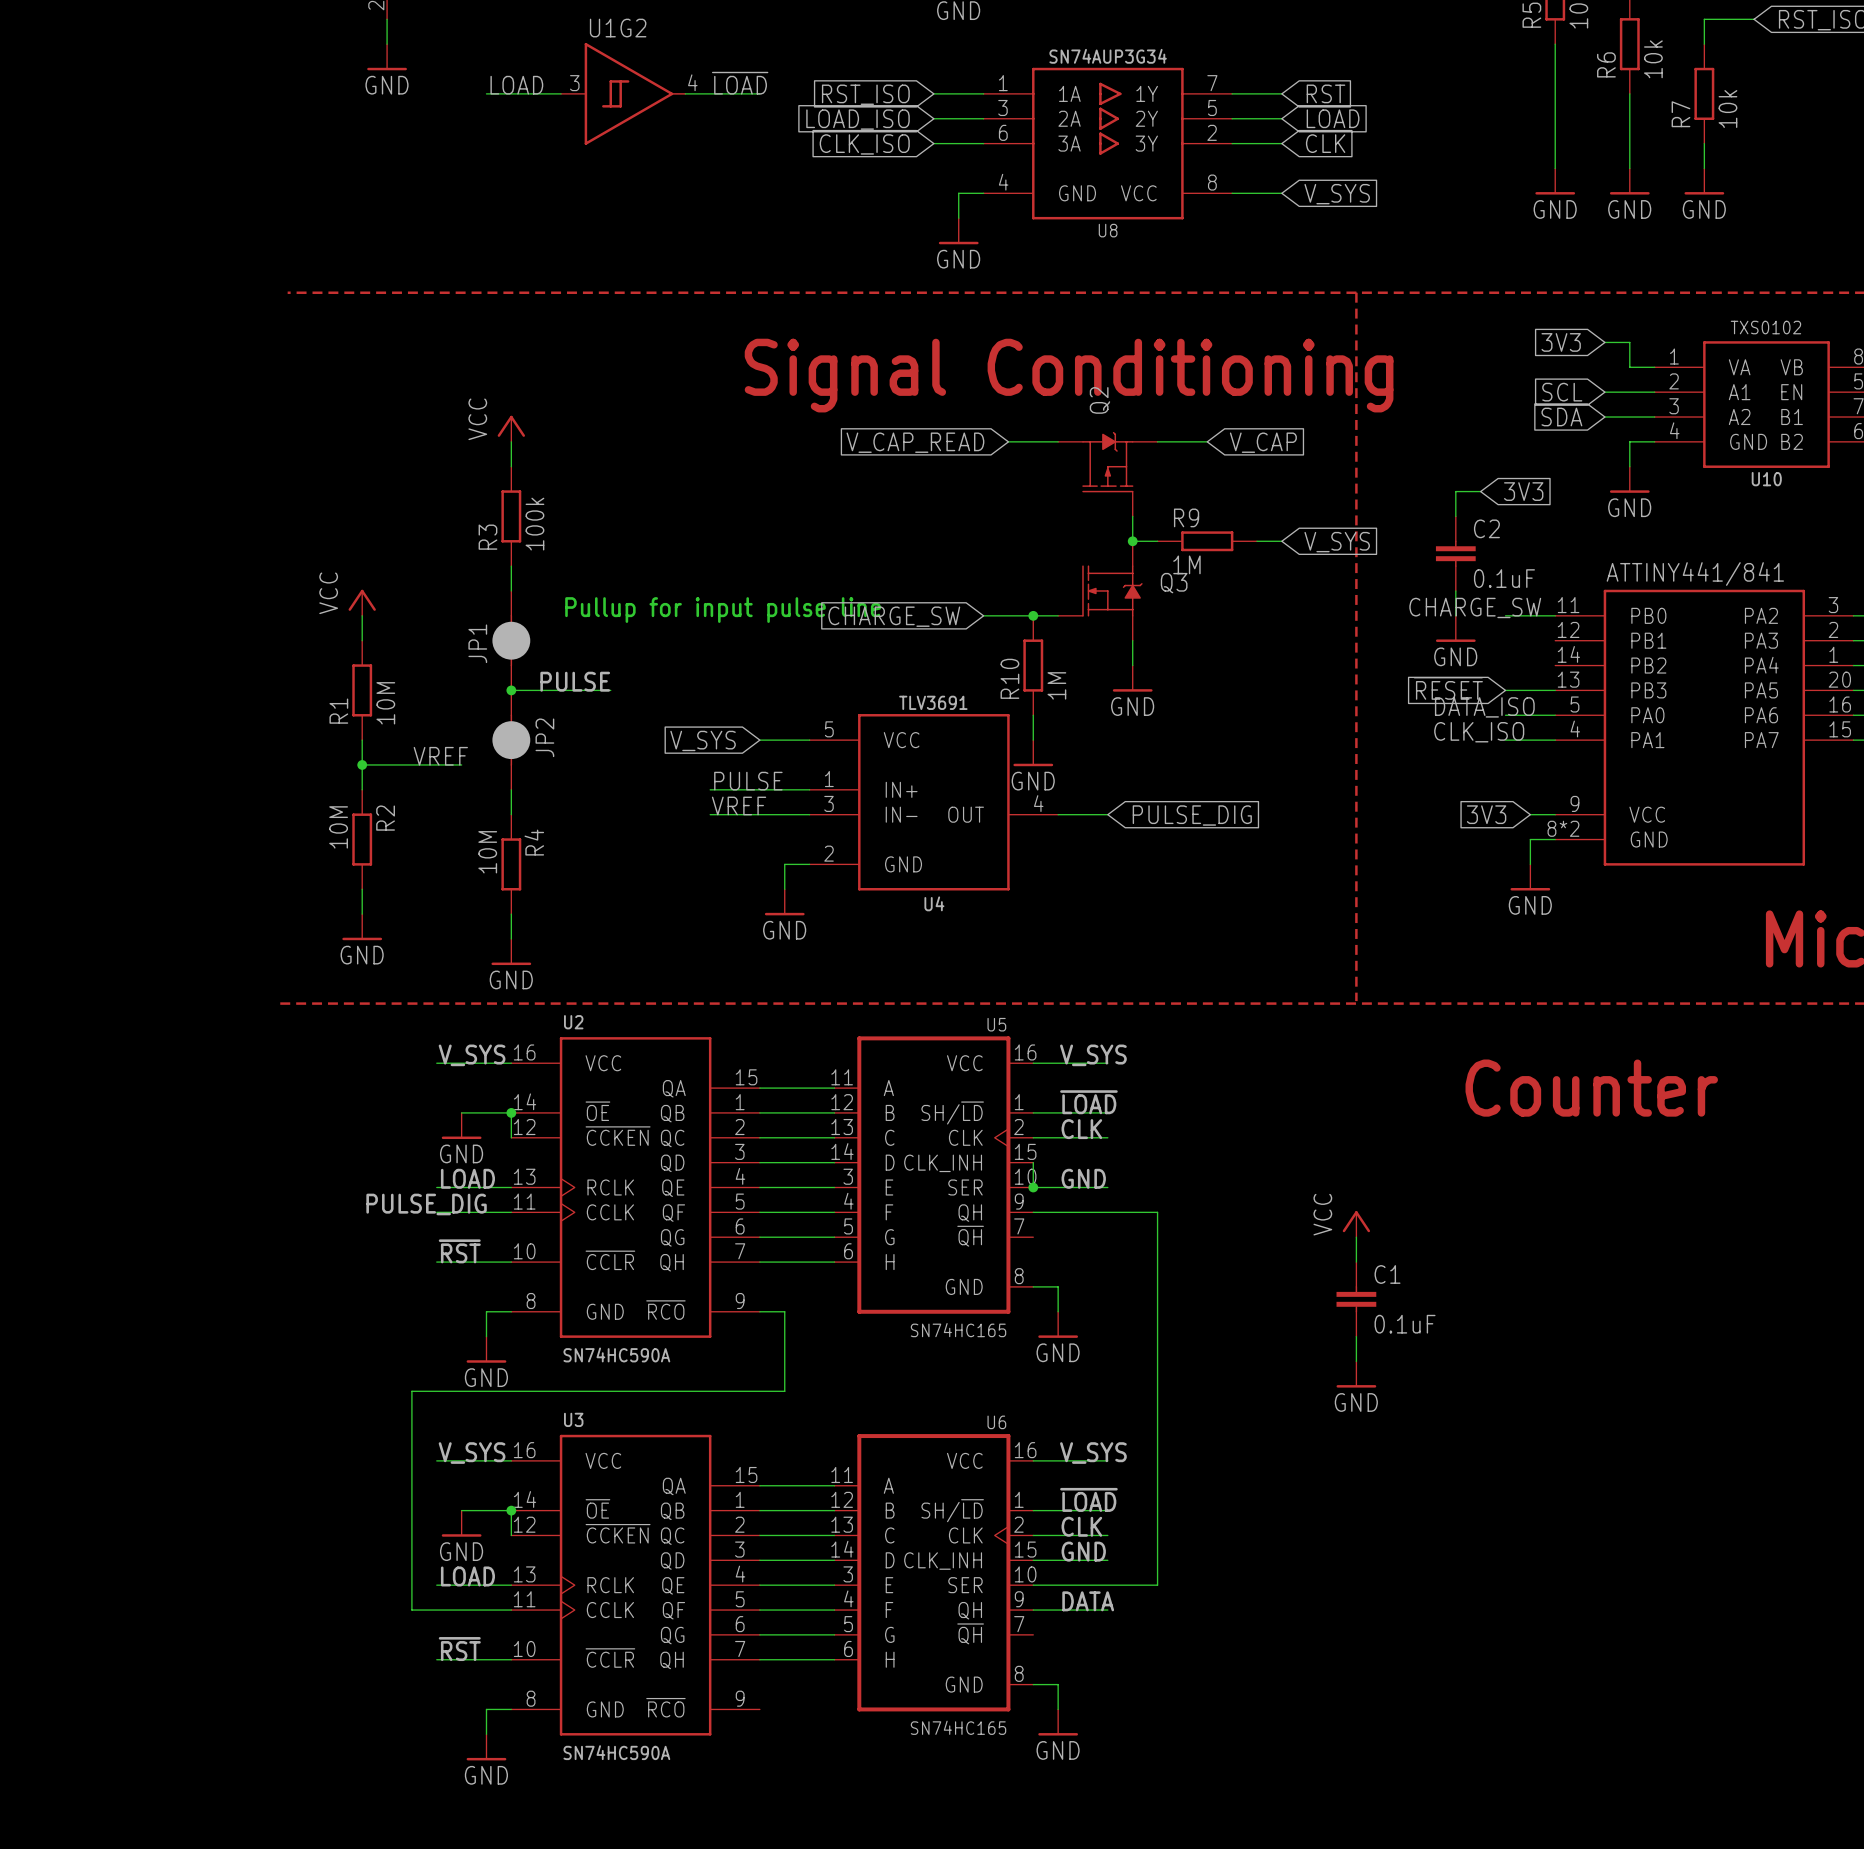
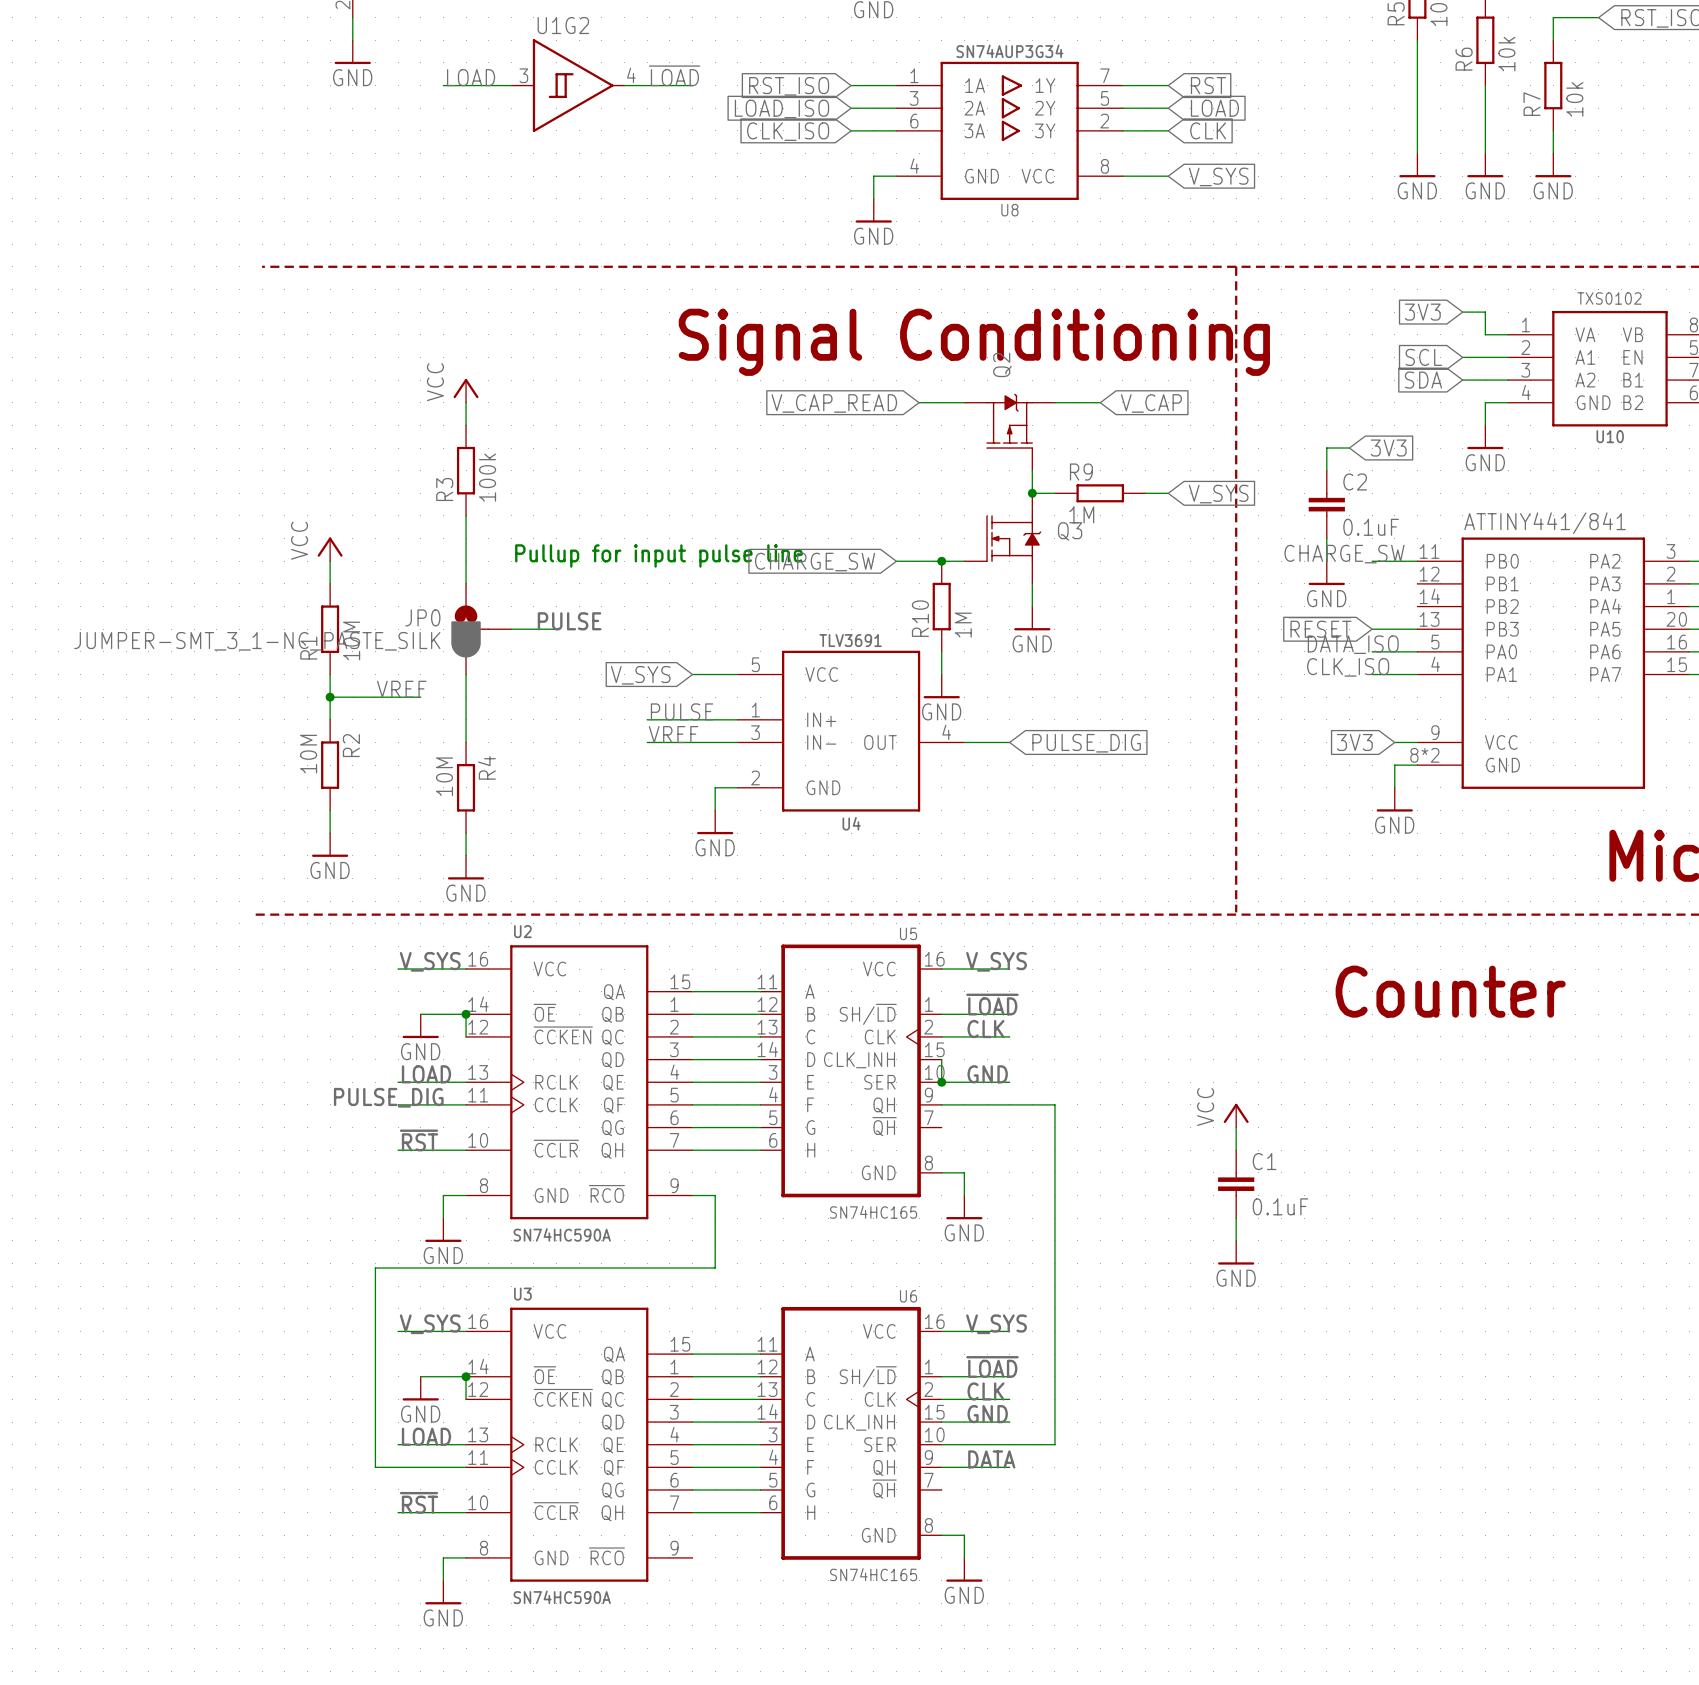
JP1: (511, 640) -> none
label position: PULSE (575, 681) -> PULSE (569, 621)
junction: (511, 690) -> none
JP0: none -> JUMPER-SMT_3_1-NC_PASTE_SILK (481, 629)
JP2: (511, 740) -> none

